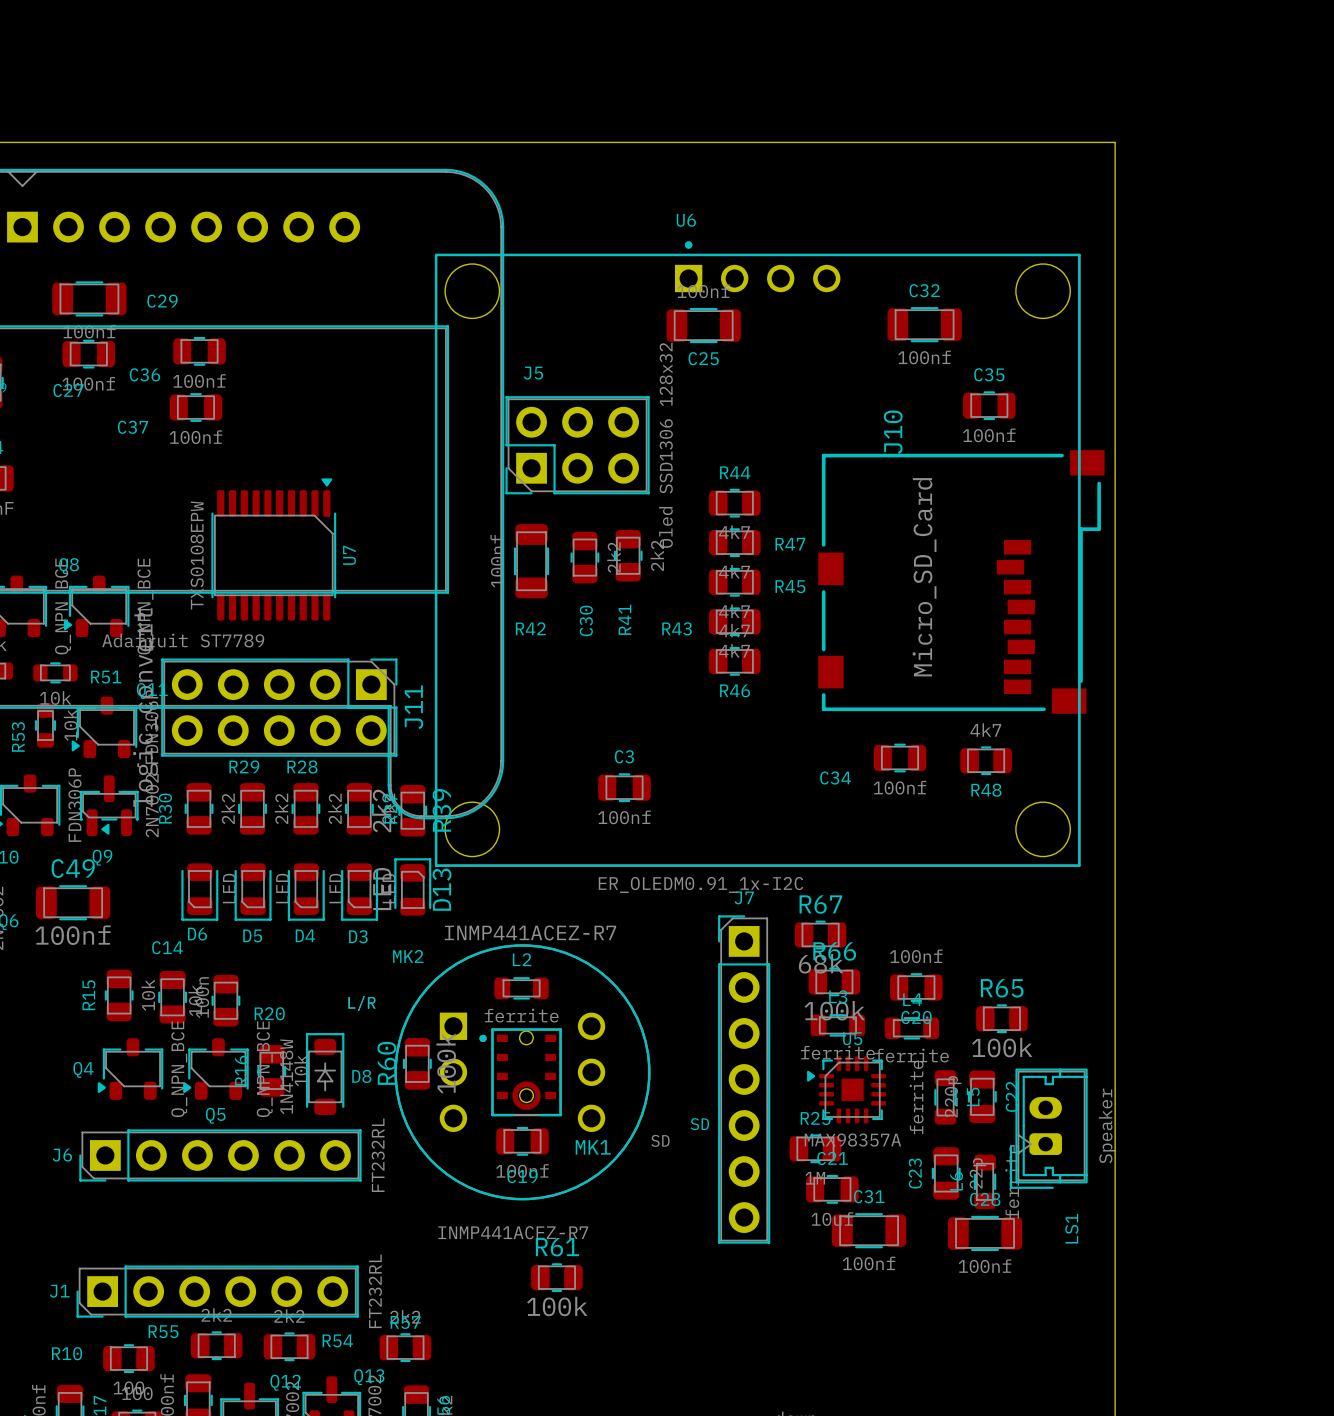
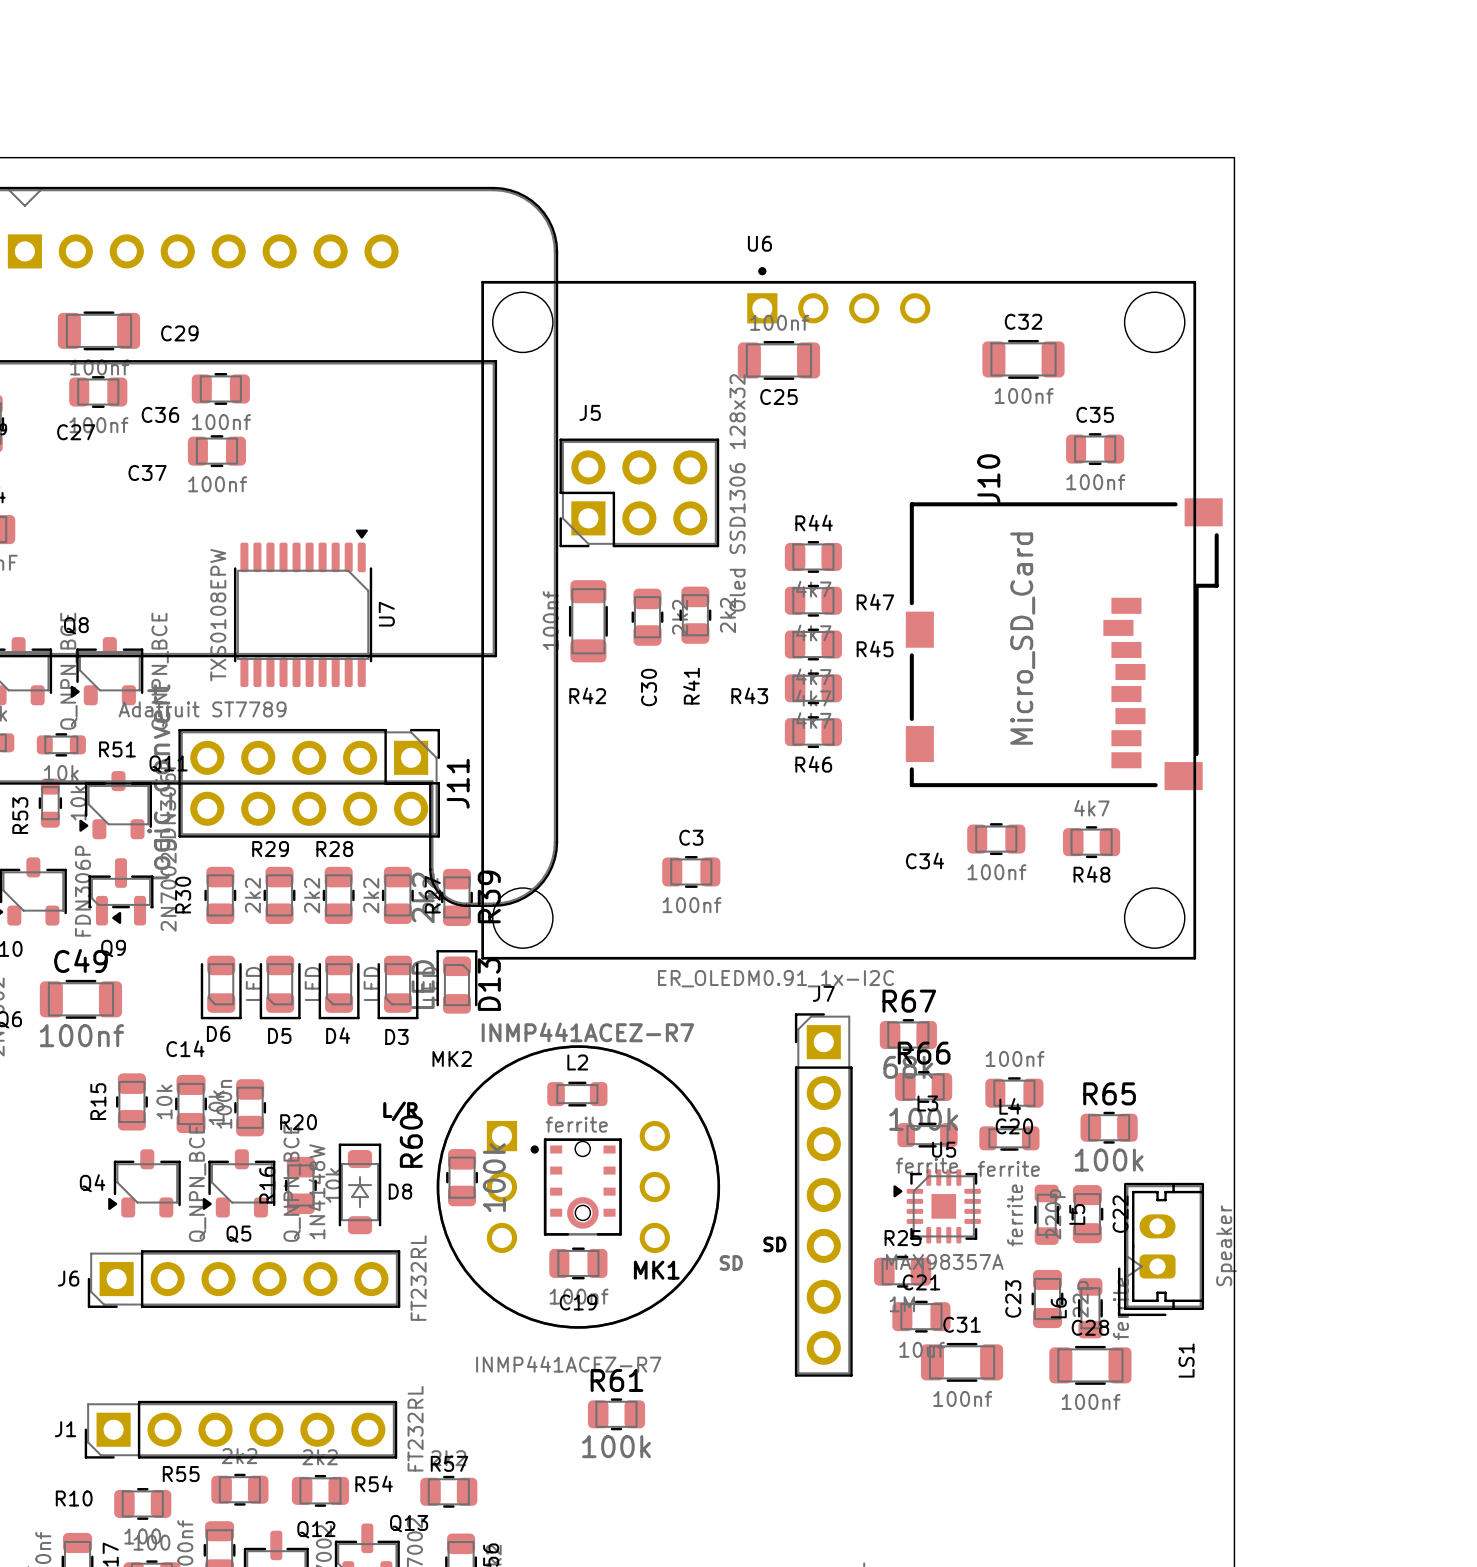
R60 name position: R60 (386, 1063) -> R60 (411, 1141)

